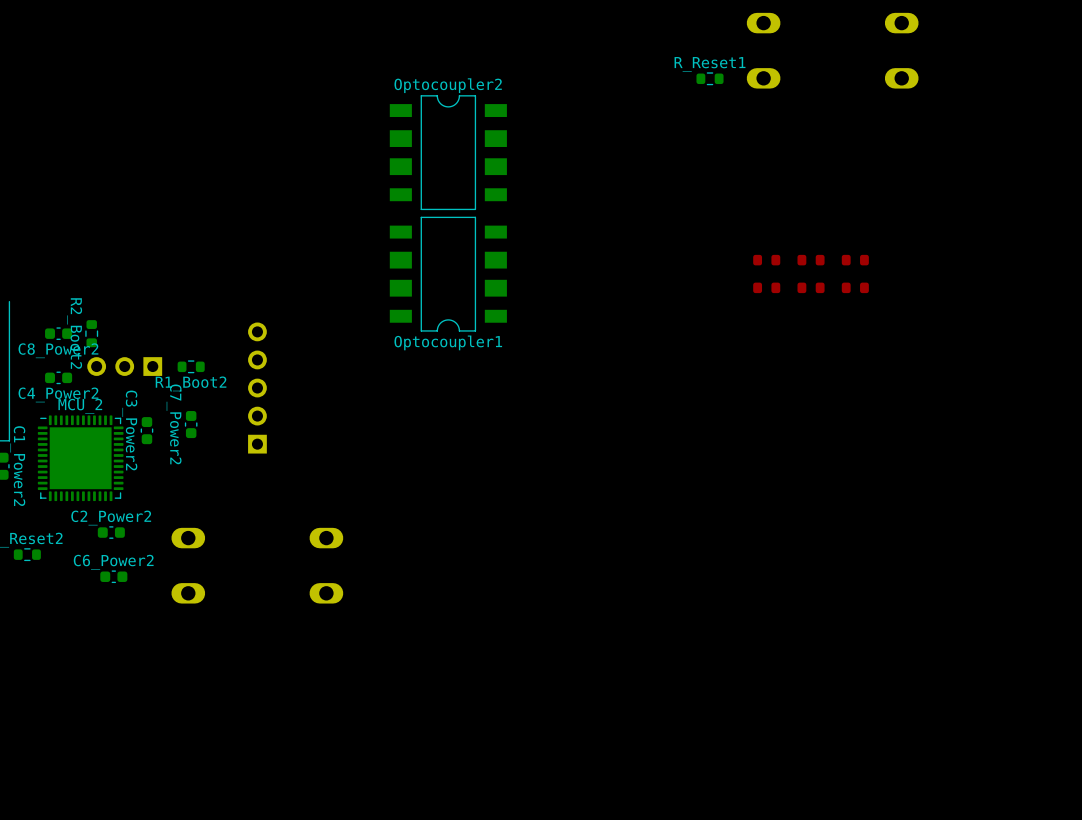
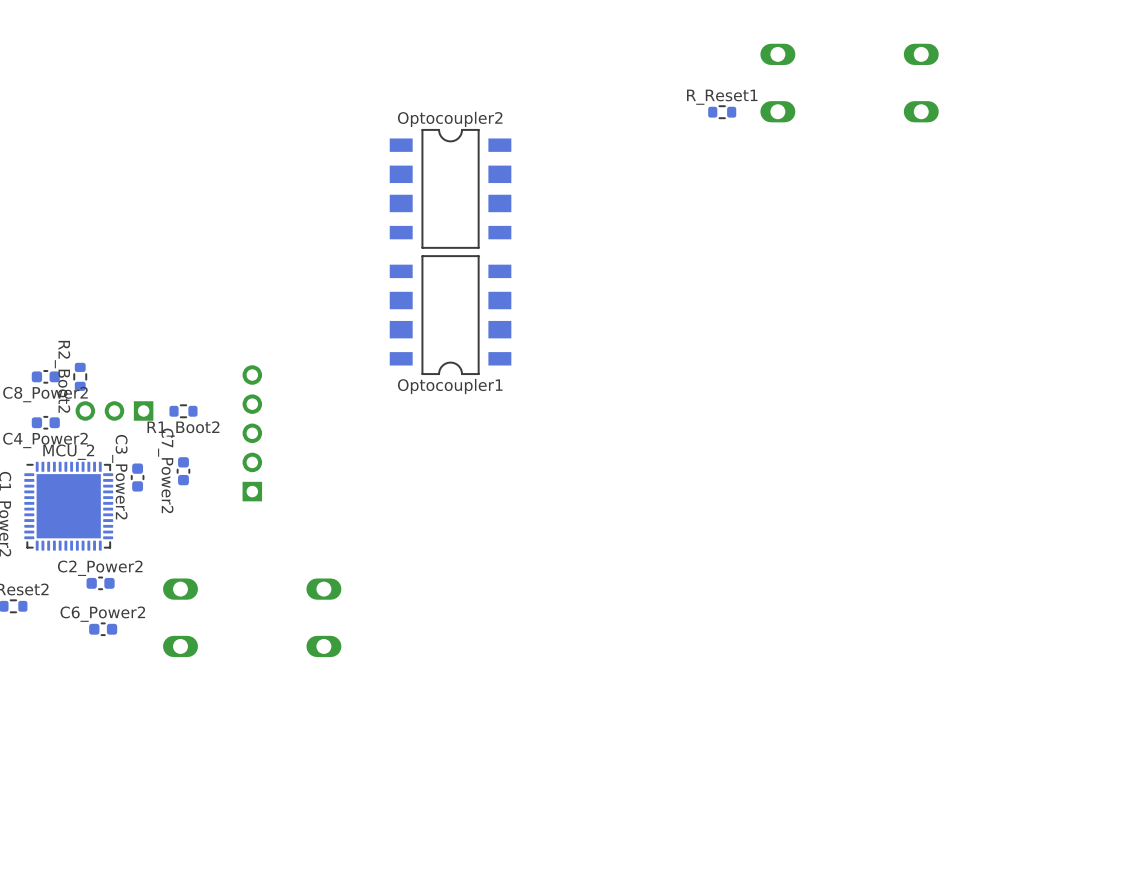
part: (766, 260) -> none
part: (811, 260) -> none
part: (855, 260) -> none
part: (766, 287) -> none
part: (811, 287) -> none
part: (855, 287) -> none

